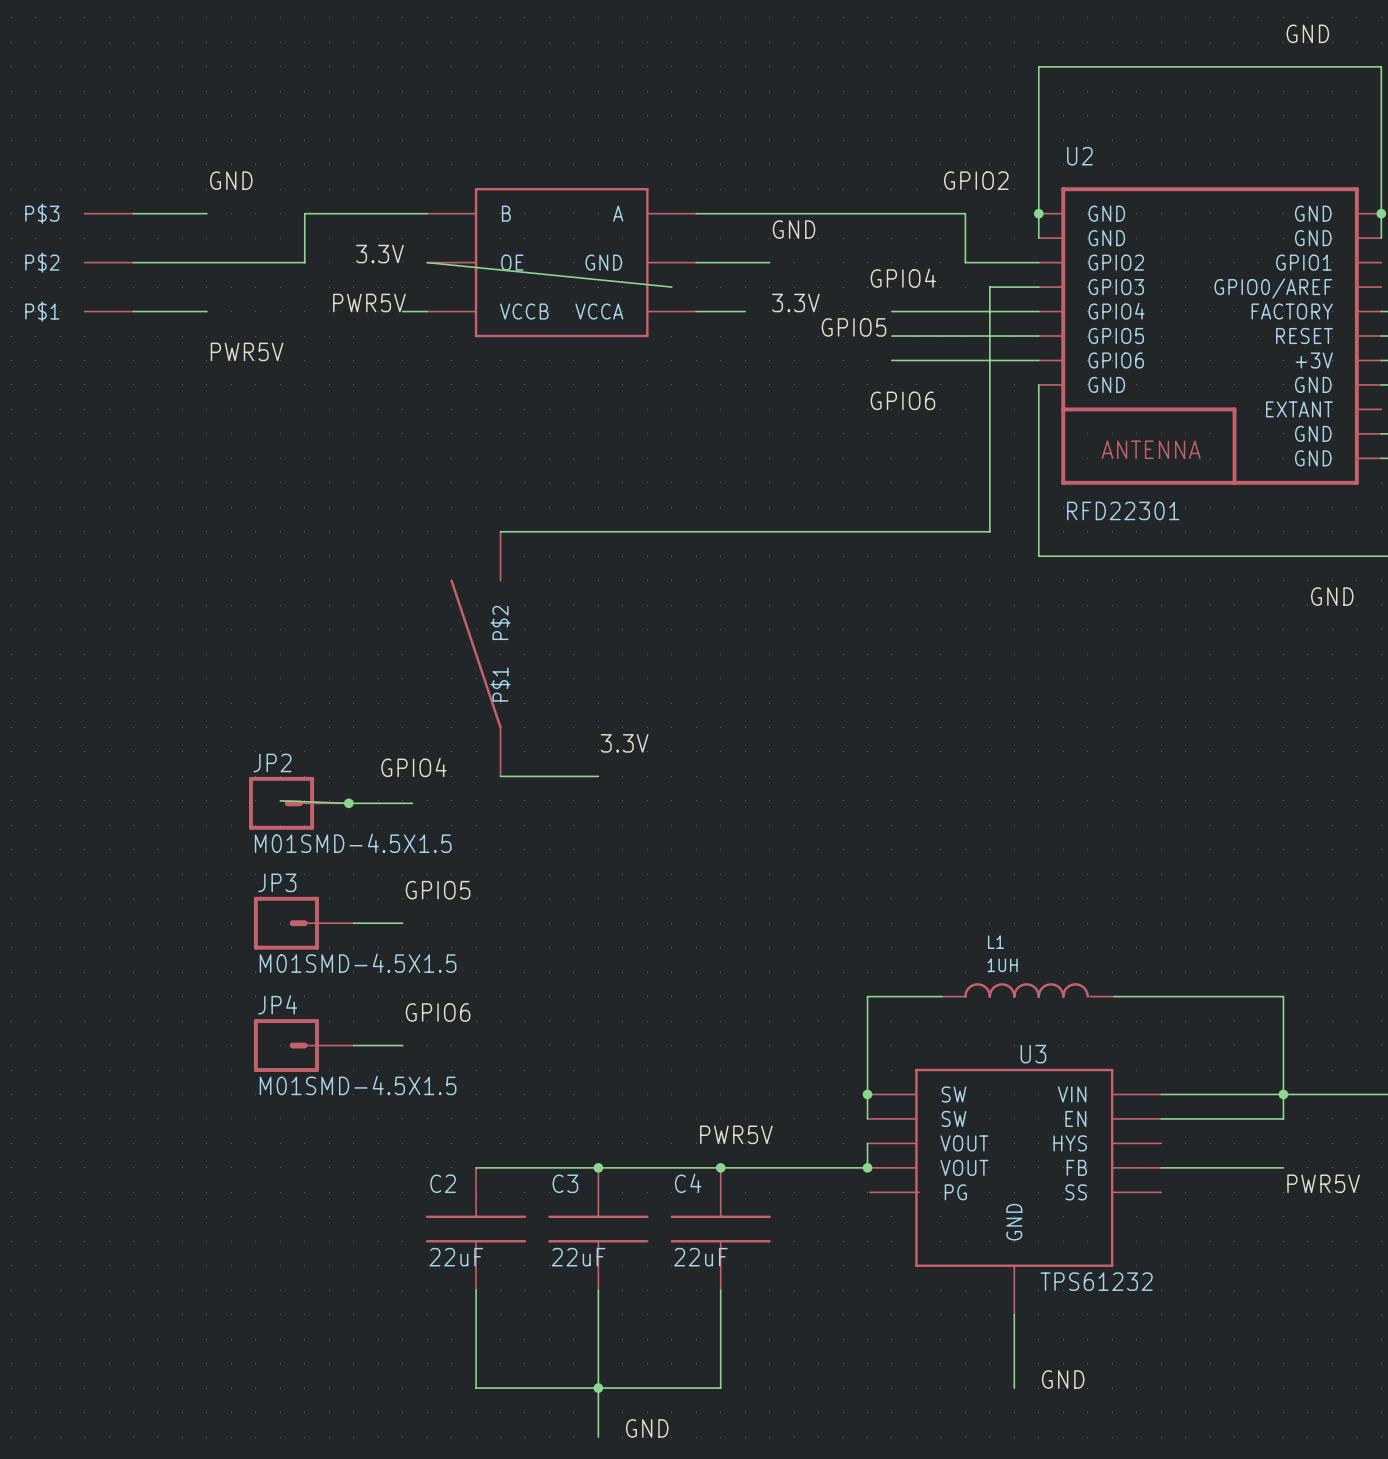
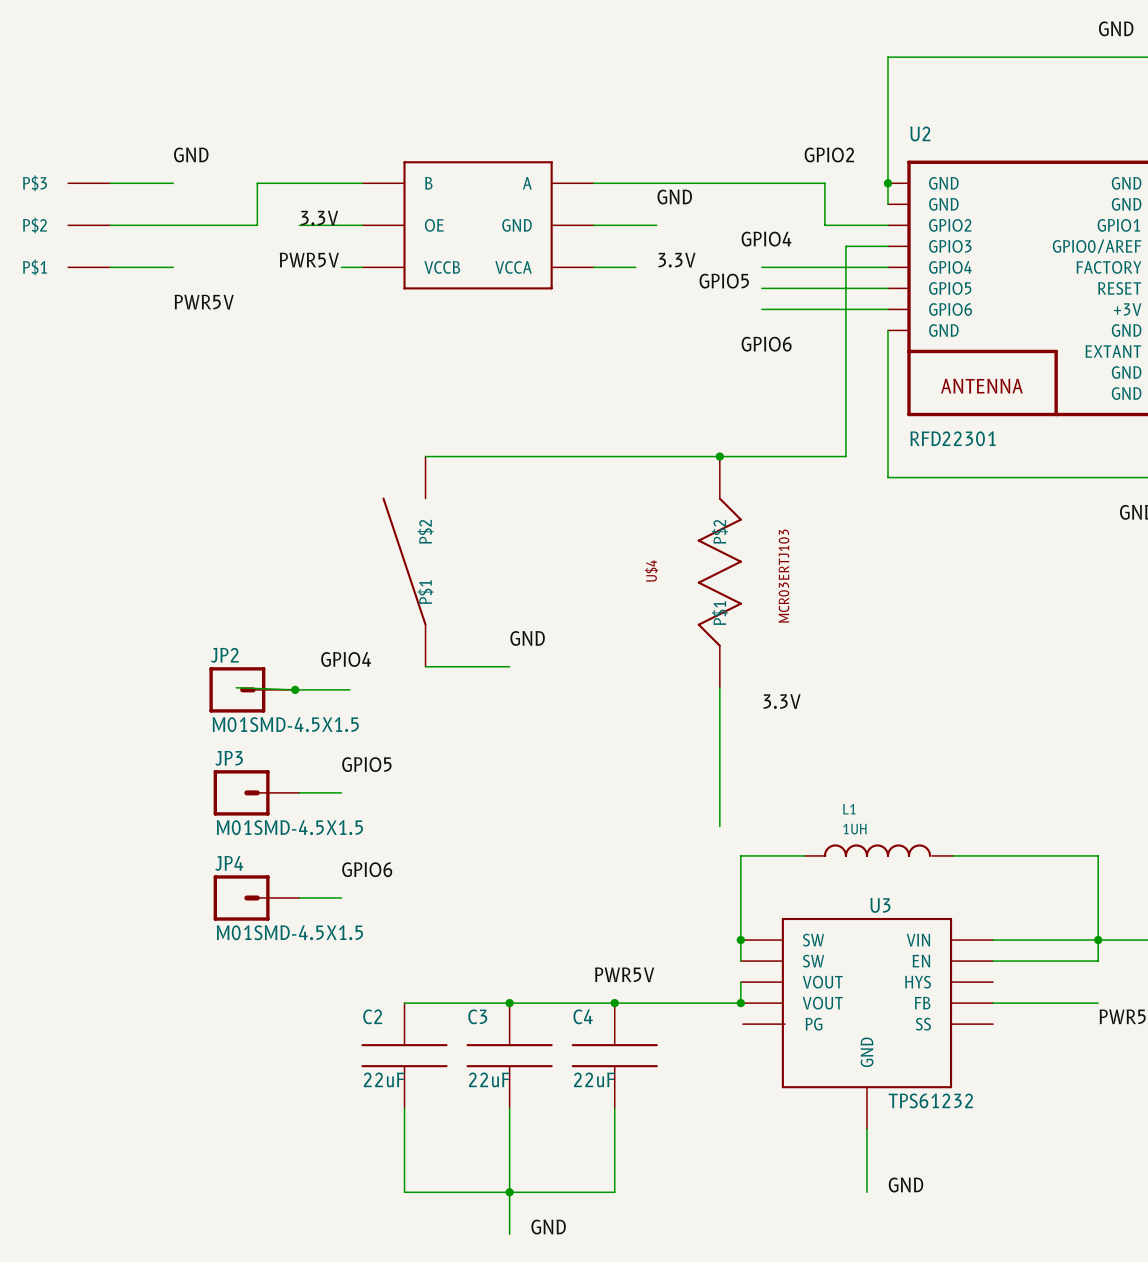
wire: (427, 262) (671, 287) -> (362, 225) (299, 225)
junction: none -> (719, 456)
U$4: none -> MCR03ERTJ103 (719, 572)
label: 3.3V (624, 743) -> GND (527, 638)
wire: none -> (719, 687) (719, 826)
label: none -> 3.3V (782, 701)

